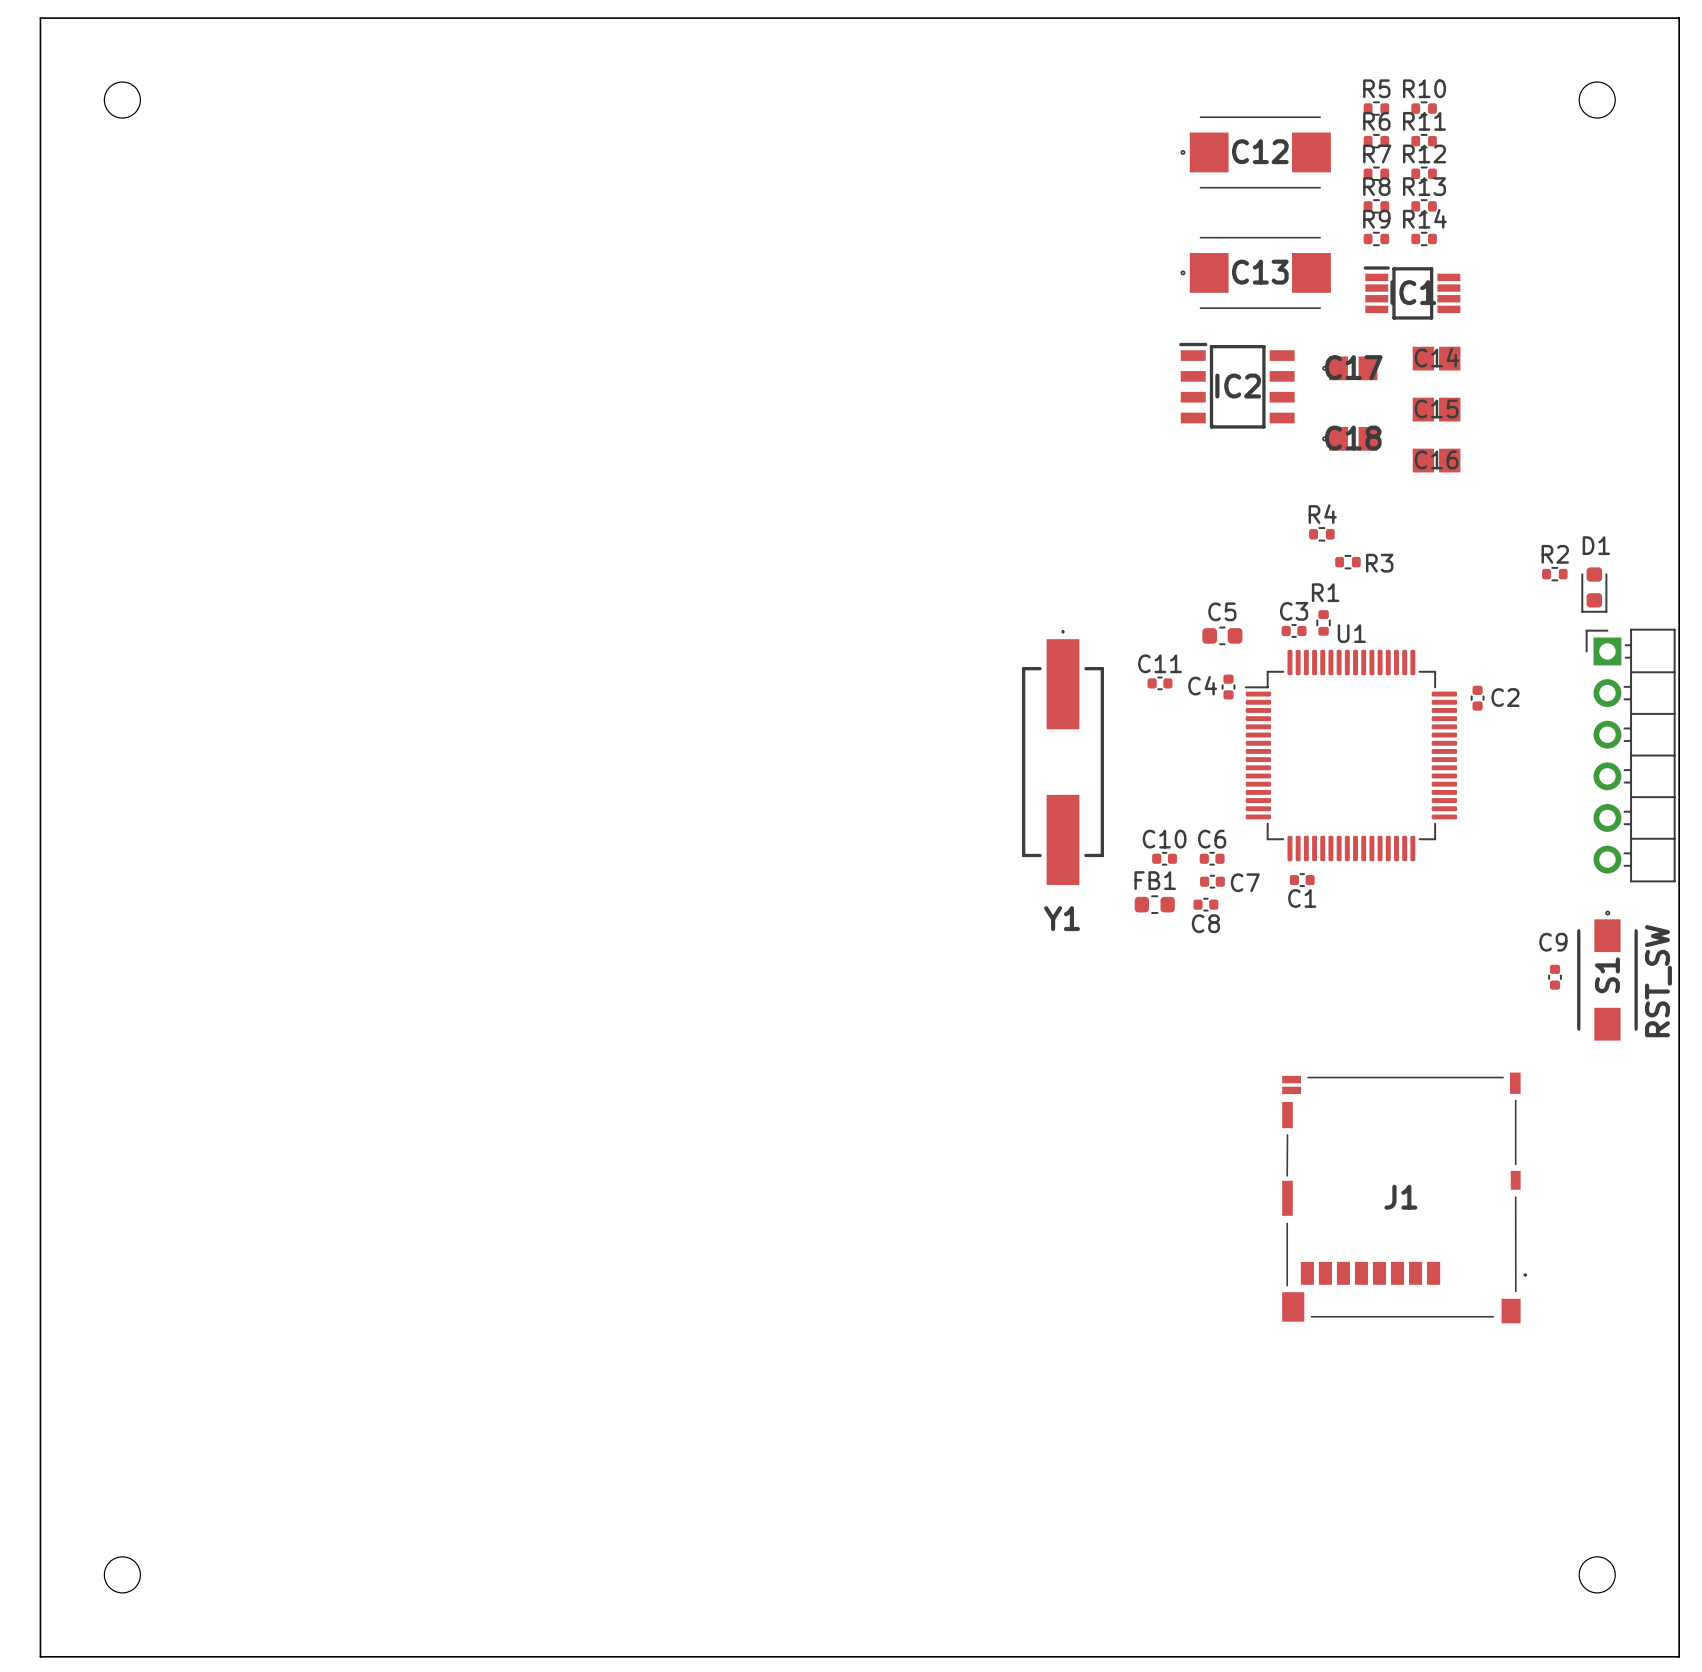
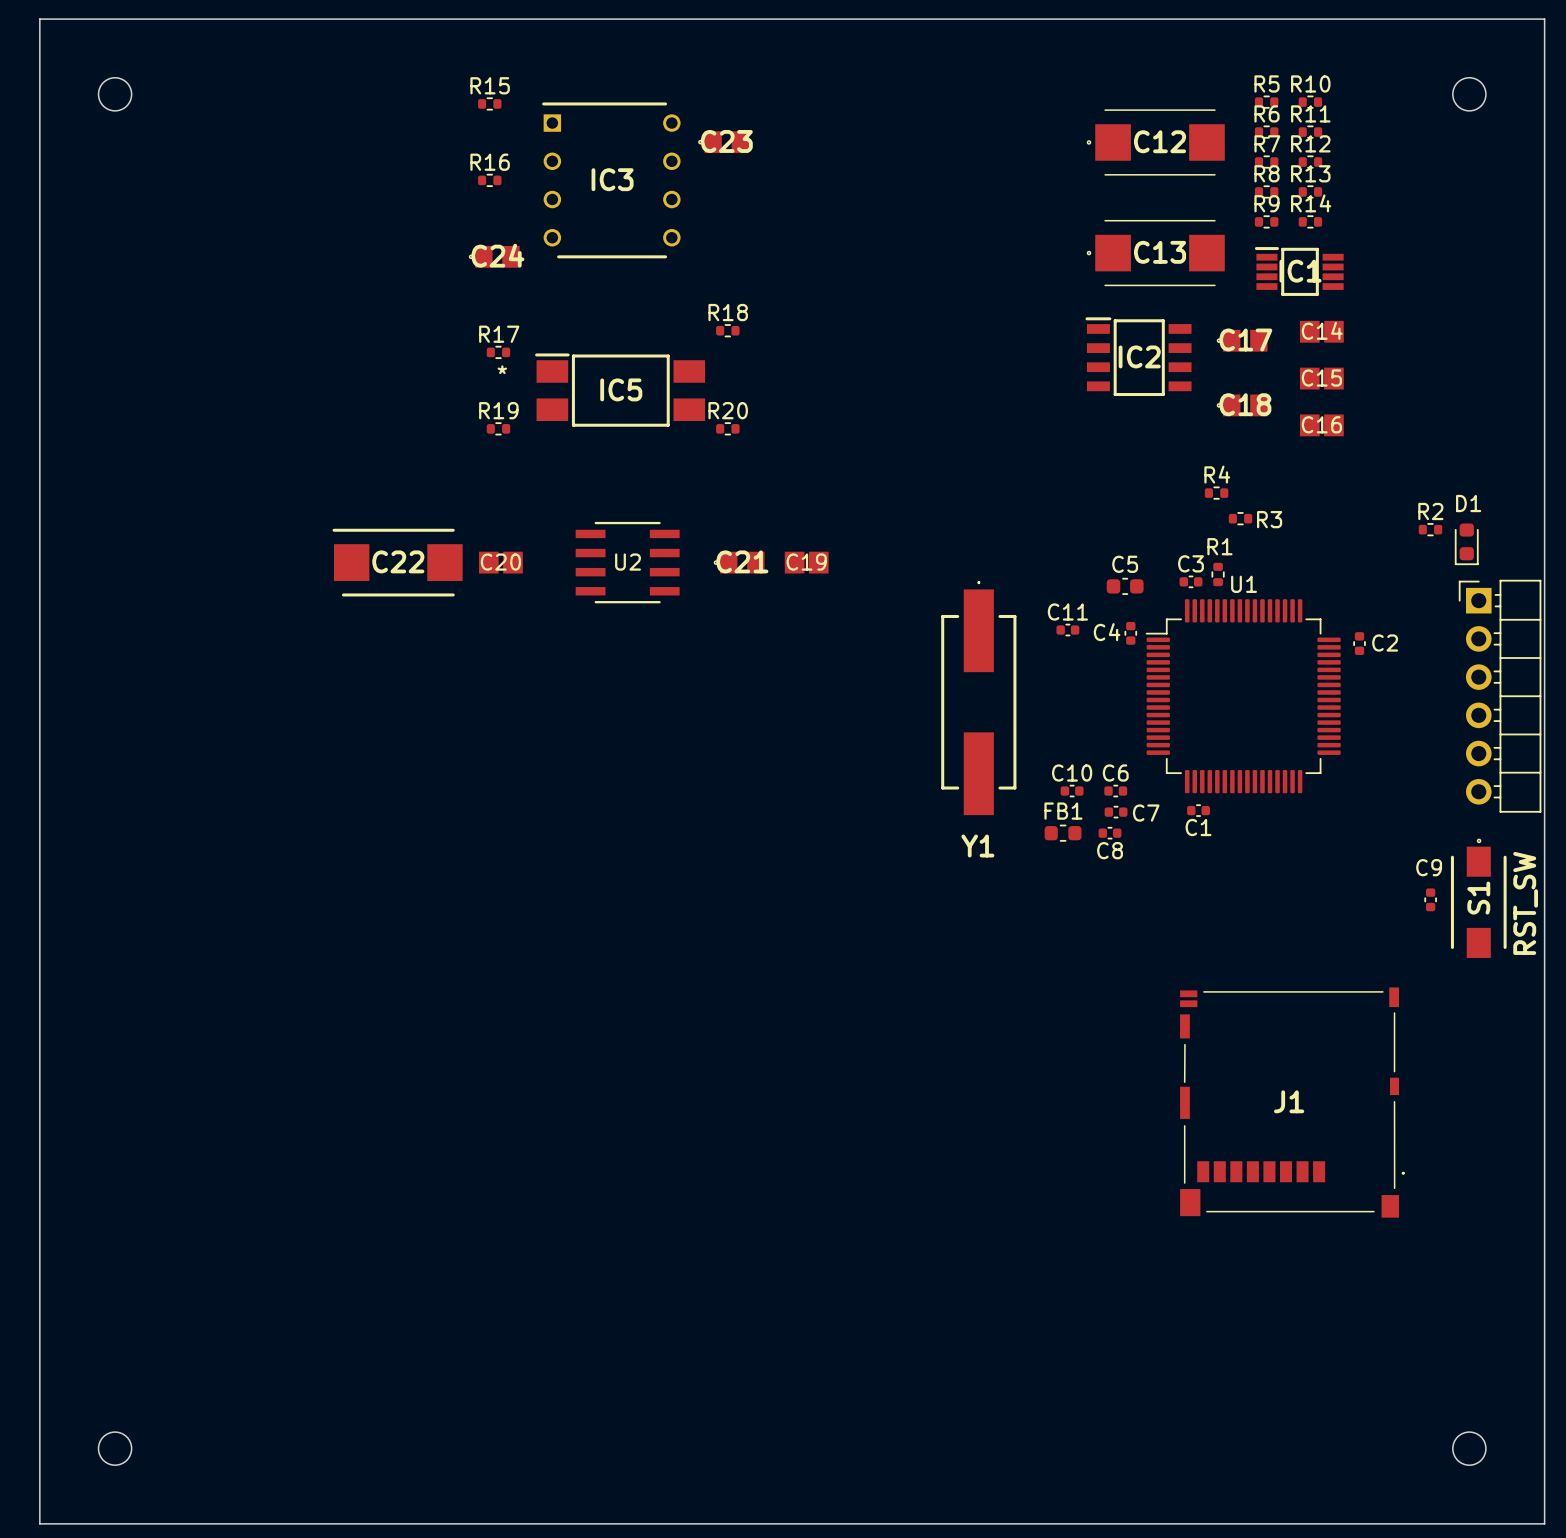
R15: none -> (489, 103)
C23: none -> (723, 142)
R16: none -> (489, 180)
IC3: none -> (611, 180)
C24: none -> (494, 256)
R18: none -> (727, 330)
R17: none -> (498, 352)
IC5: none -> (620, 390)
R19: none -> (498, 428)
R20: none -> (727, 428)
C22: none -> (397, 562)
C20: none -> (500, 562)
U2: none -> (627, 562)
C21: none -> (739, 562)
C19: none -> (806, 562)

